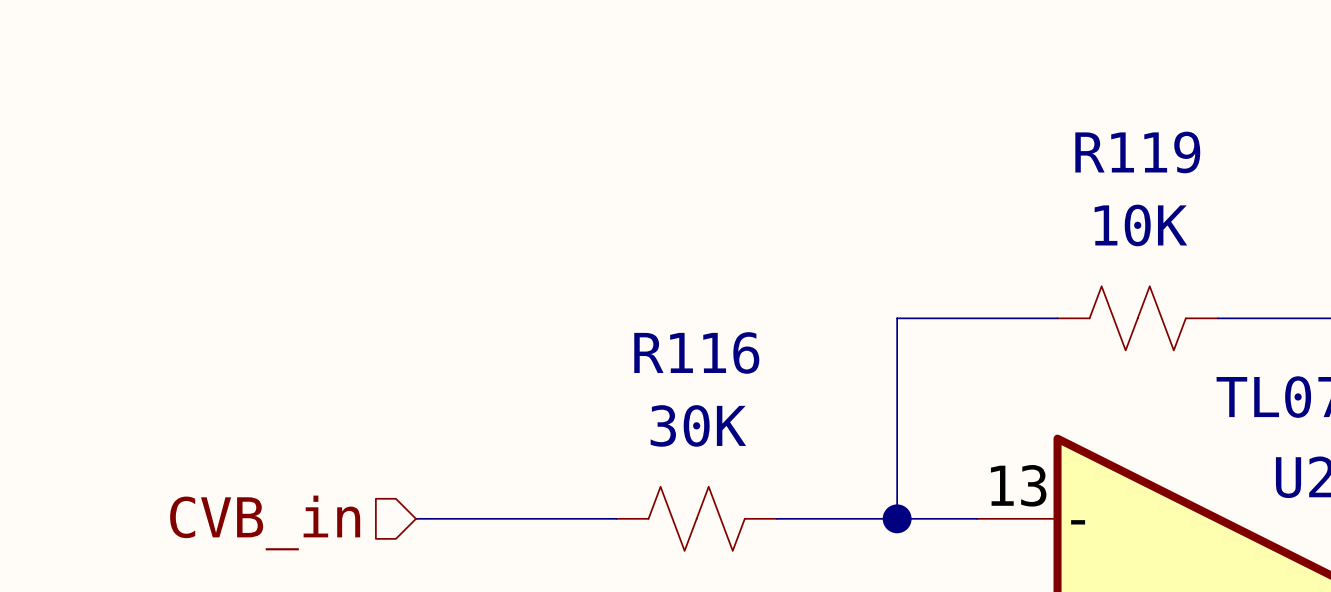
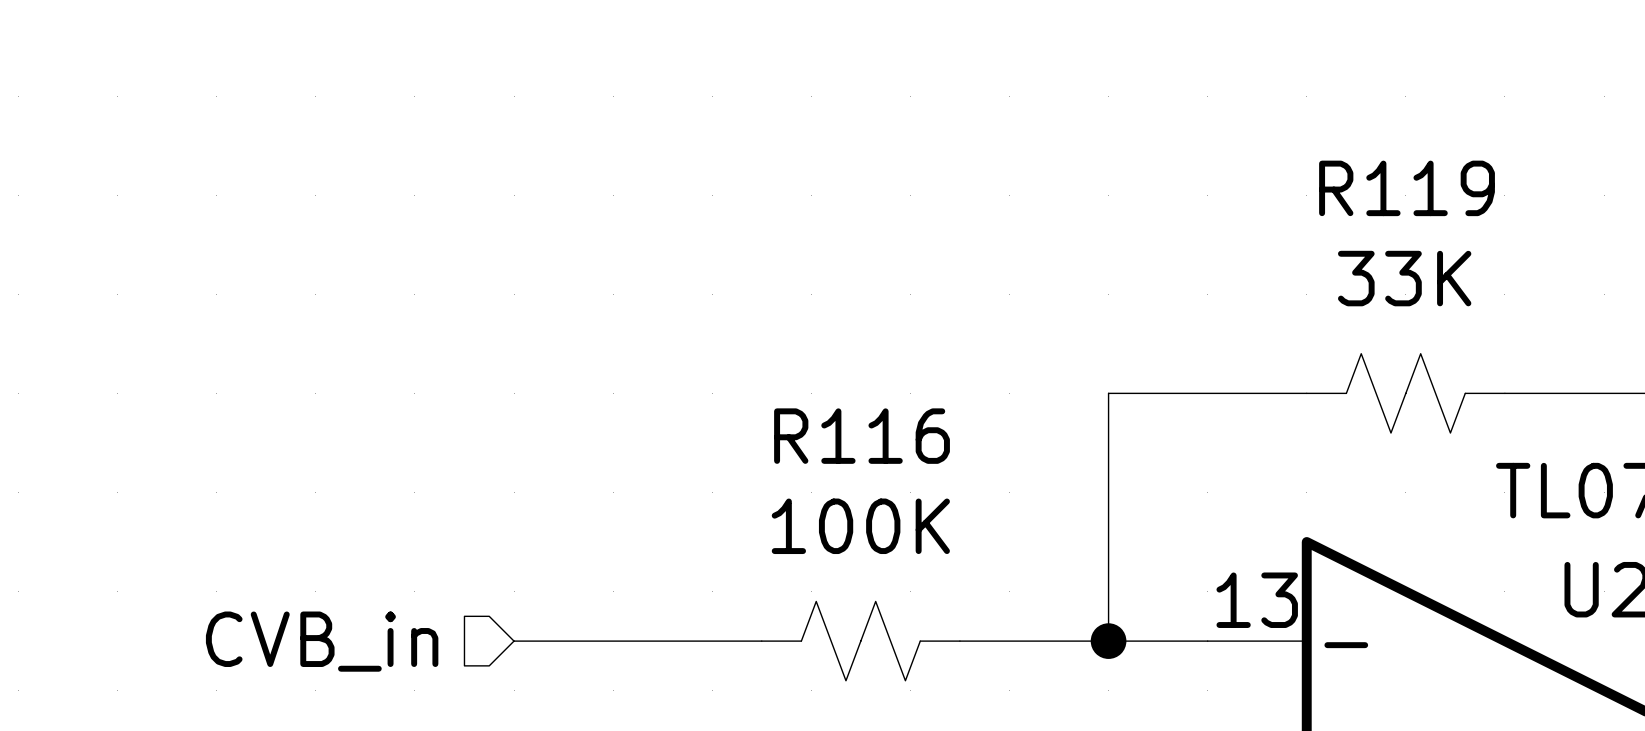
R119 value: 10K (1140, 225) -> 33K (1404, 278)
R116 value: 30K (698, 425) -> 100K (860, 526)

